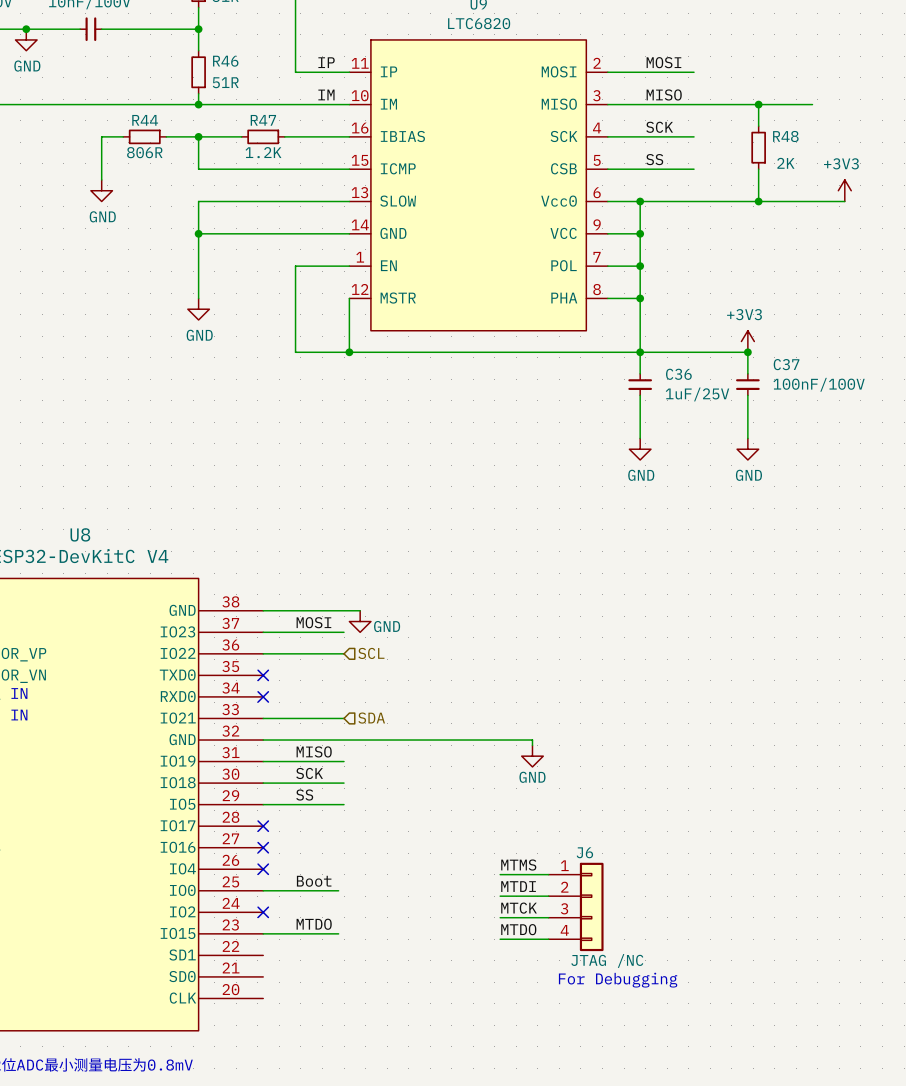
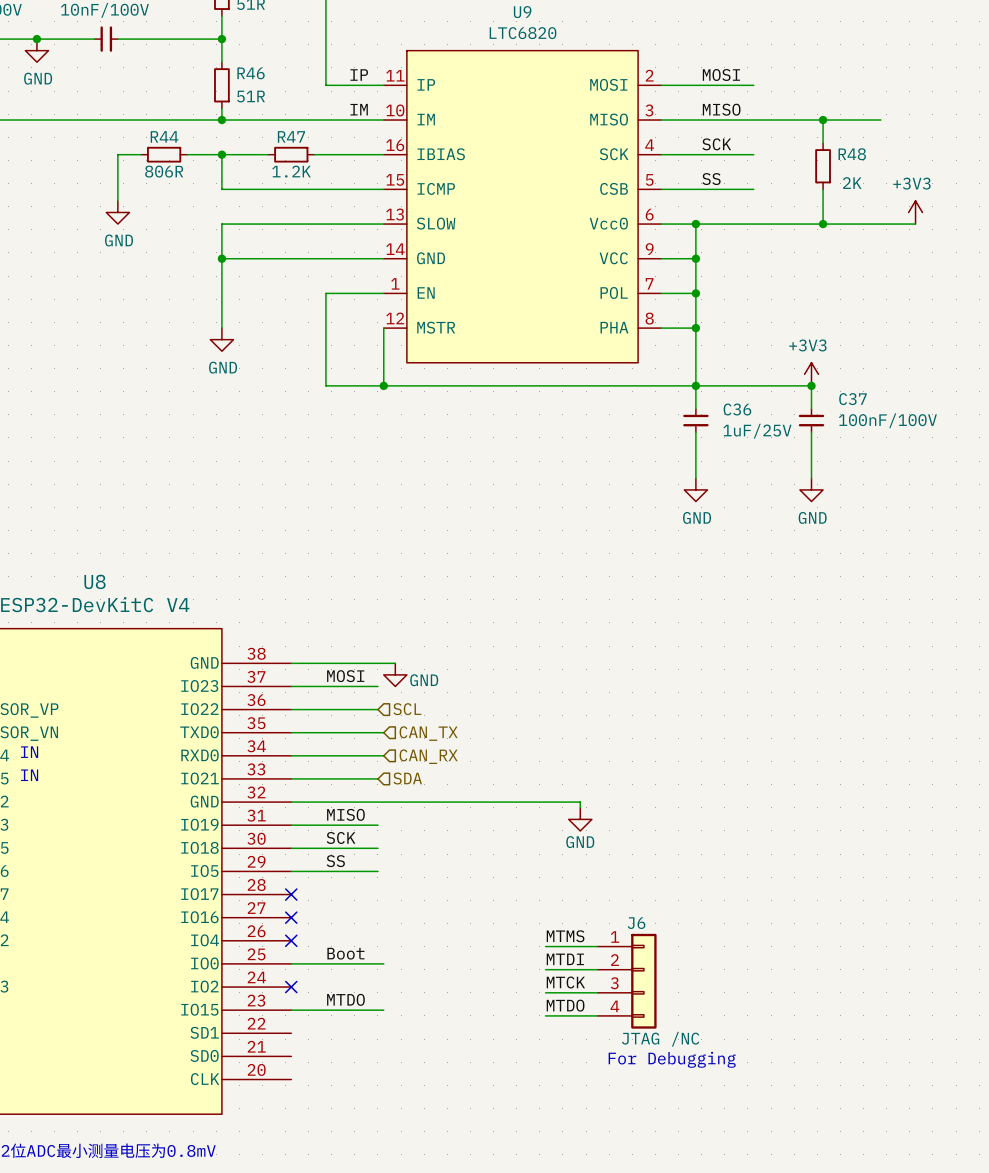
wire: none -> (291, 732) (383, 732)
no-connect mark: (263, 675) -> none
hierarchical label: none -> CAN_TX (428, 733)
wire: none -> (291, 755) (383, 755)
no-connect mark: (263, 696) -> none
hierarchical label: none -> CAN_RX (428, 756)
wire: none -> (372, 963) (383, 963)
wire: none -> (372, 1010) (383, 1010)

